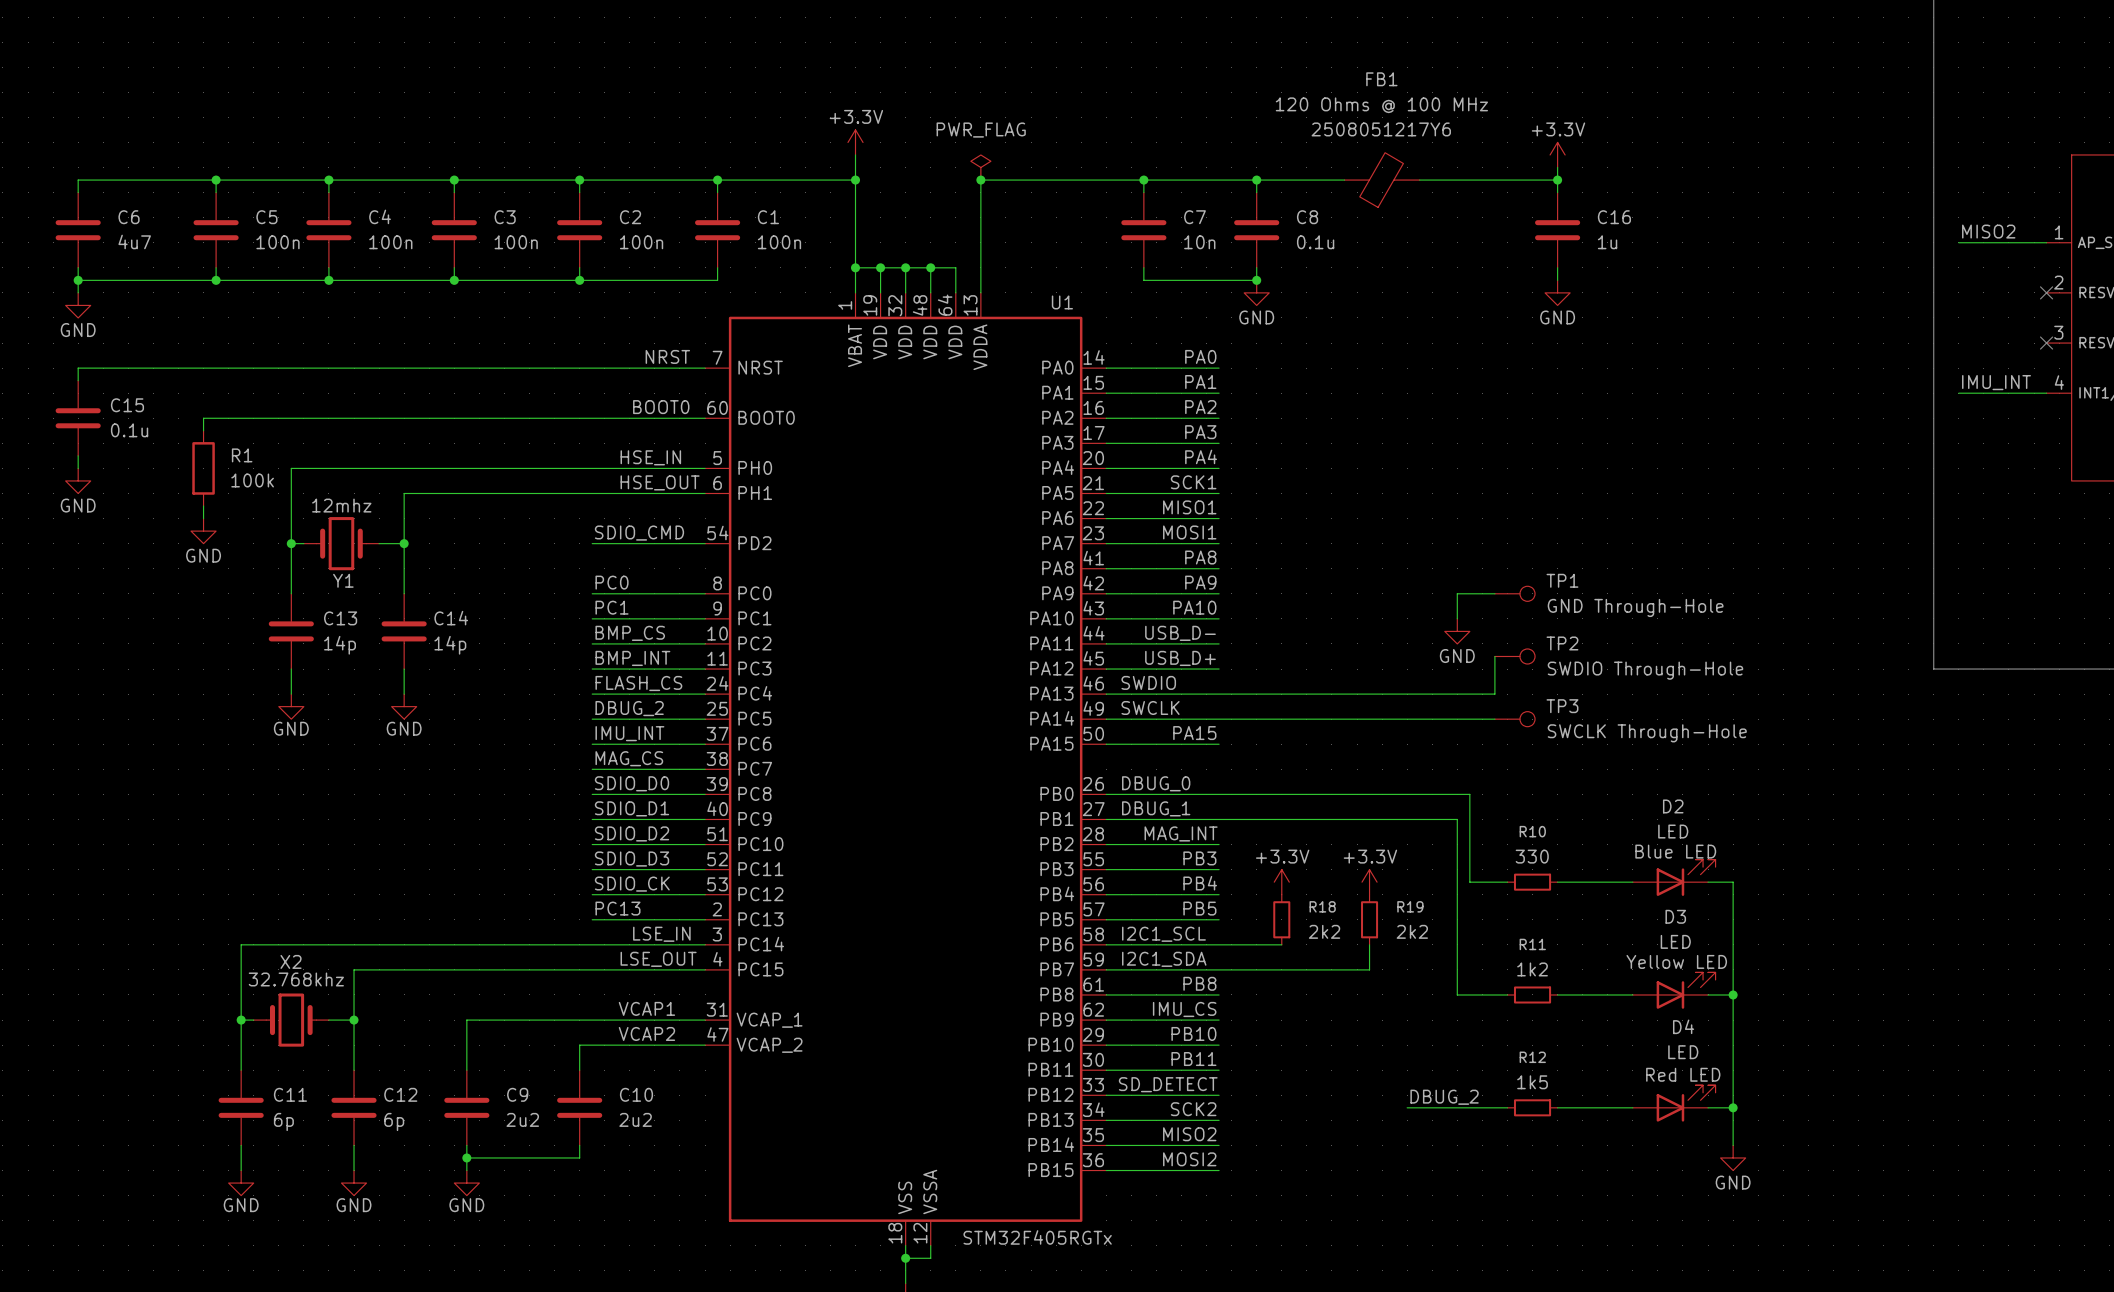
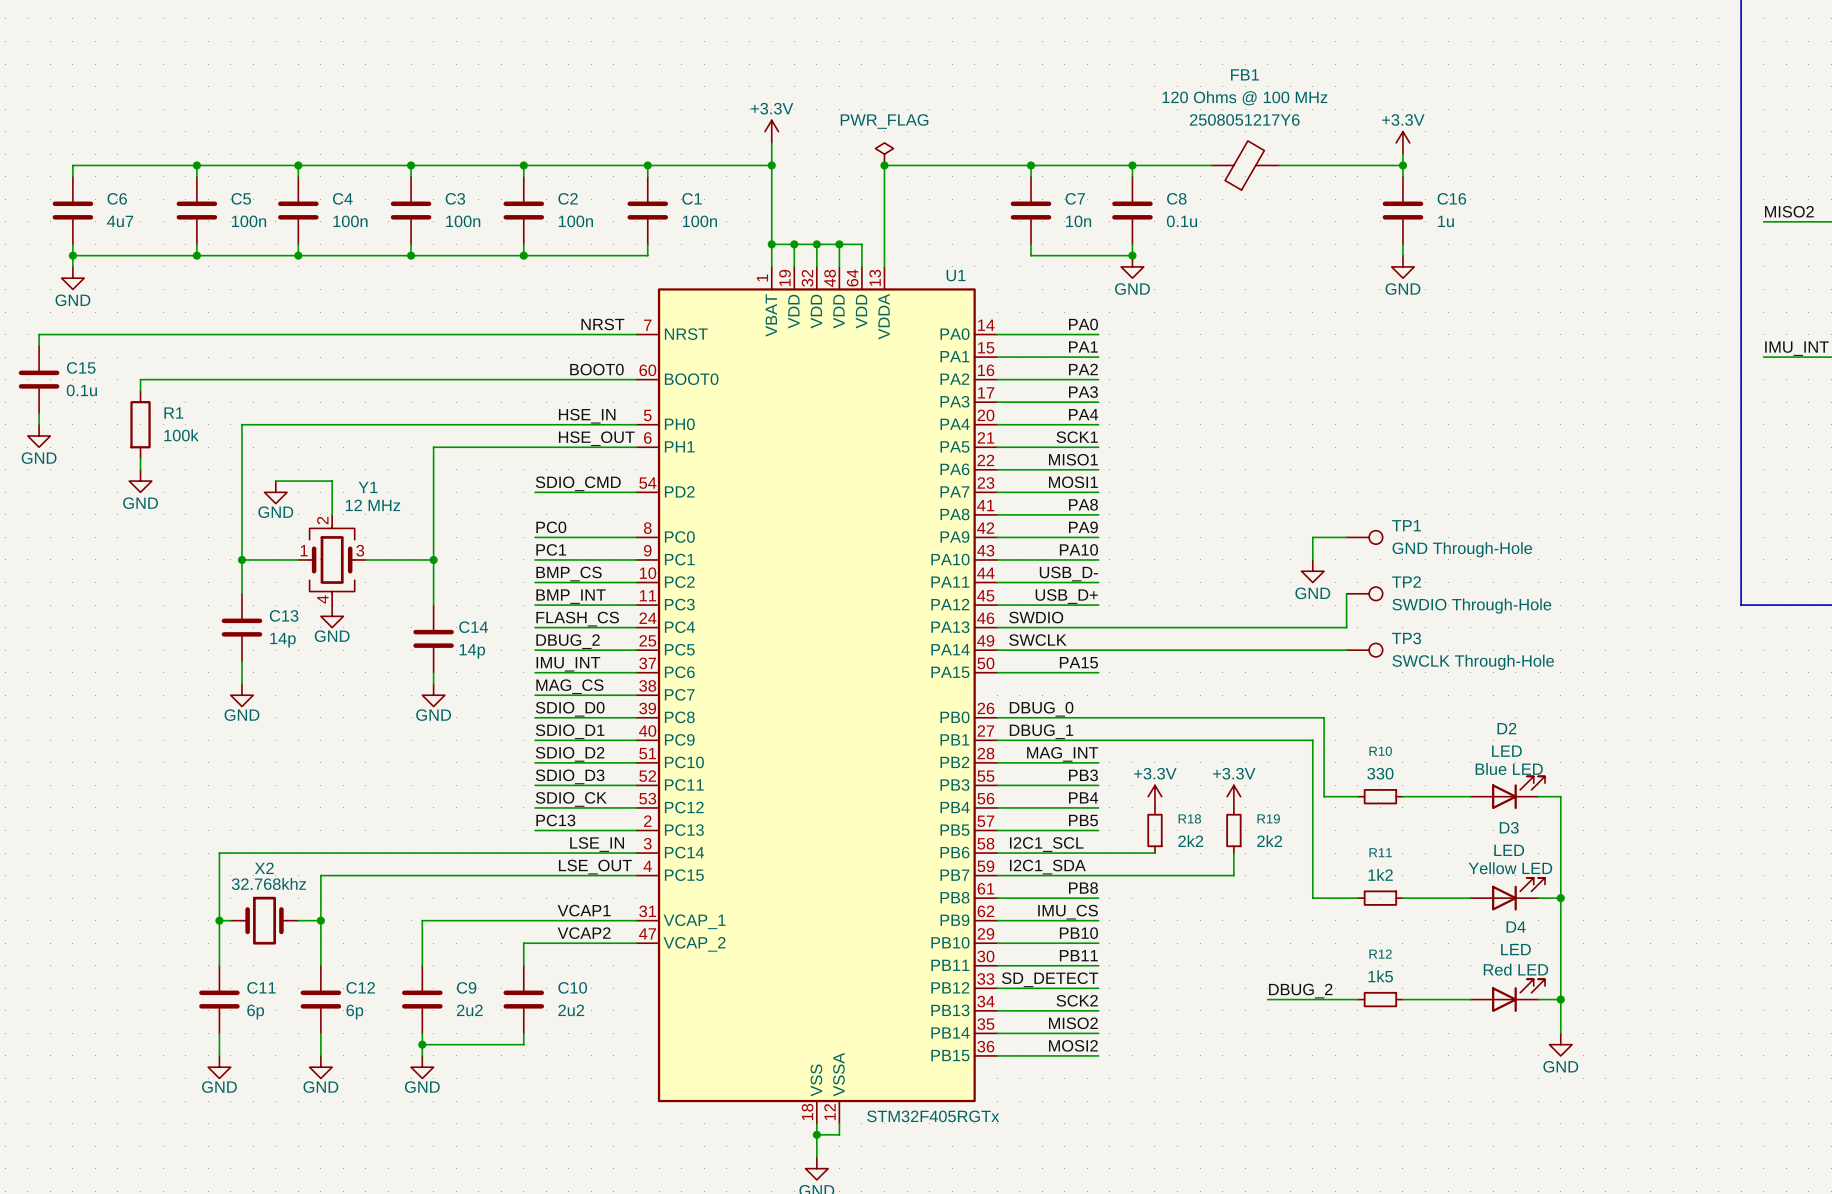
wire: (78, 368) (78, 380) -> (72, 334) (39, 334) (39, 345)
C15 position: (78, 418) -> (39, 379)
wire: (203, 418) (203, 430) -> (185, 379) (140, 379) (140, 390)
wire: (78, 455) (78, 468) -> (39, 413) (39, 424)
R1 position: (203, 468) -> (140, 424)
wire: (291, 468) (291, 593) -> (264, 424) (241, 424) (241, 593)
power symbol position: GND (78, 480) -> GND (39, 435)
wire: (479, 493) (404, 493) (404, 593) -> (433, 447) (433, 605)
Y1 value: 12mhz (341, 505) -> 12 MHz (372, 505)
wire: (203, 506) (203, 518) -> (140, 458) (140, 469)
Y1 symbol: [303, 517, 380, 571] -> [298, 514, 366, 606]
power symbol: none -> GND (140, 481)
power symbol: GND (203, 531) -> none
wire: none -> (275, 481) (332, 481) (332, 514)
junction: (291, 543) -> none
power symbol: none -> GND (275, 492)
wire: (379, 543) (404, 543) -> none
junction: (404, 543) -> none
Y1 name position: Y1 (343, 580) -> Y1 (368, 487)
wire: none -> (241, 559) (298, 559)
junction: none -> (241, 559)
wire: none -> (365, 559) (433, 559)
junction: none -> (433, 559)
C13 position: (291, 631) -> (241, 627)
C14 position: (404, 631) -> (433, 638)
wire: (291, 669) (291, 694) -> (241, 661) (241, 683)
wire: (404, 669) (404, 694) -> none
power symbol: none -> GND (332, 616)
power symbol: GND (291, 706) -> none
power symbol: GND (404, 706) -> none
wire: none -> (433, 672) (433, 683)
power symbol: none -> GND (241, 695)
power symbol: none -> GND (433, 695)

